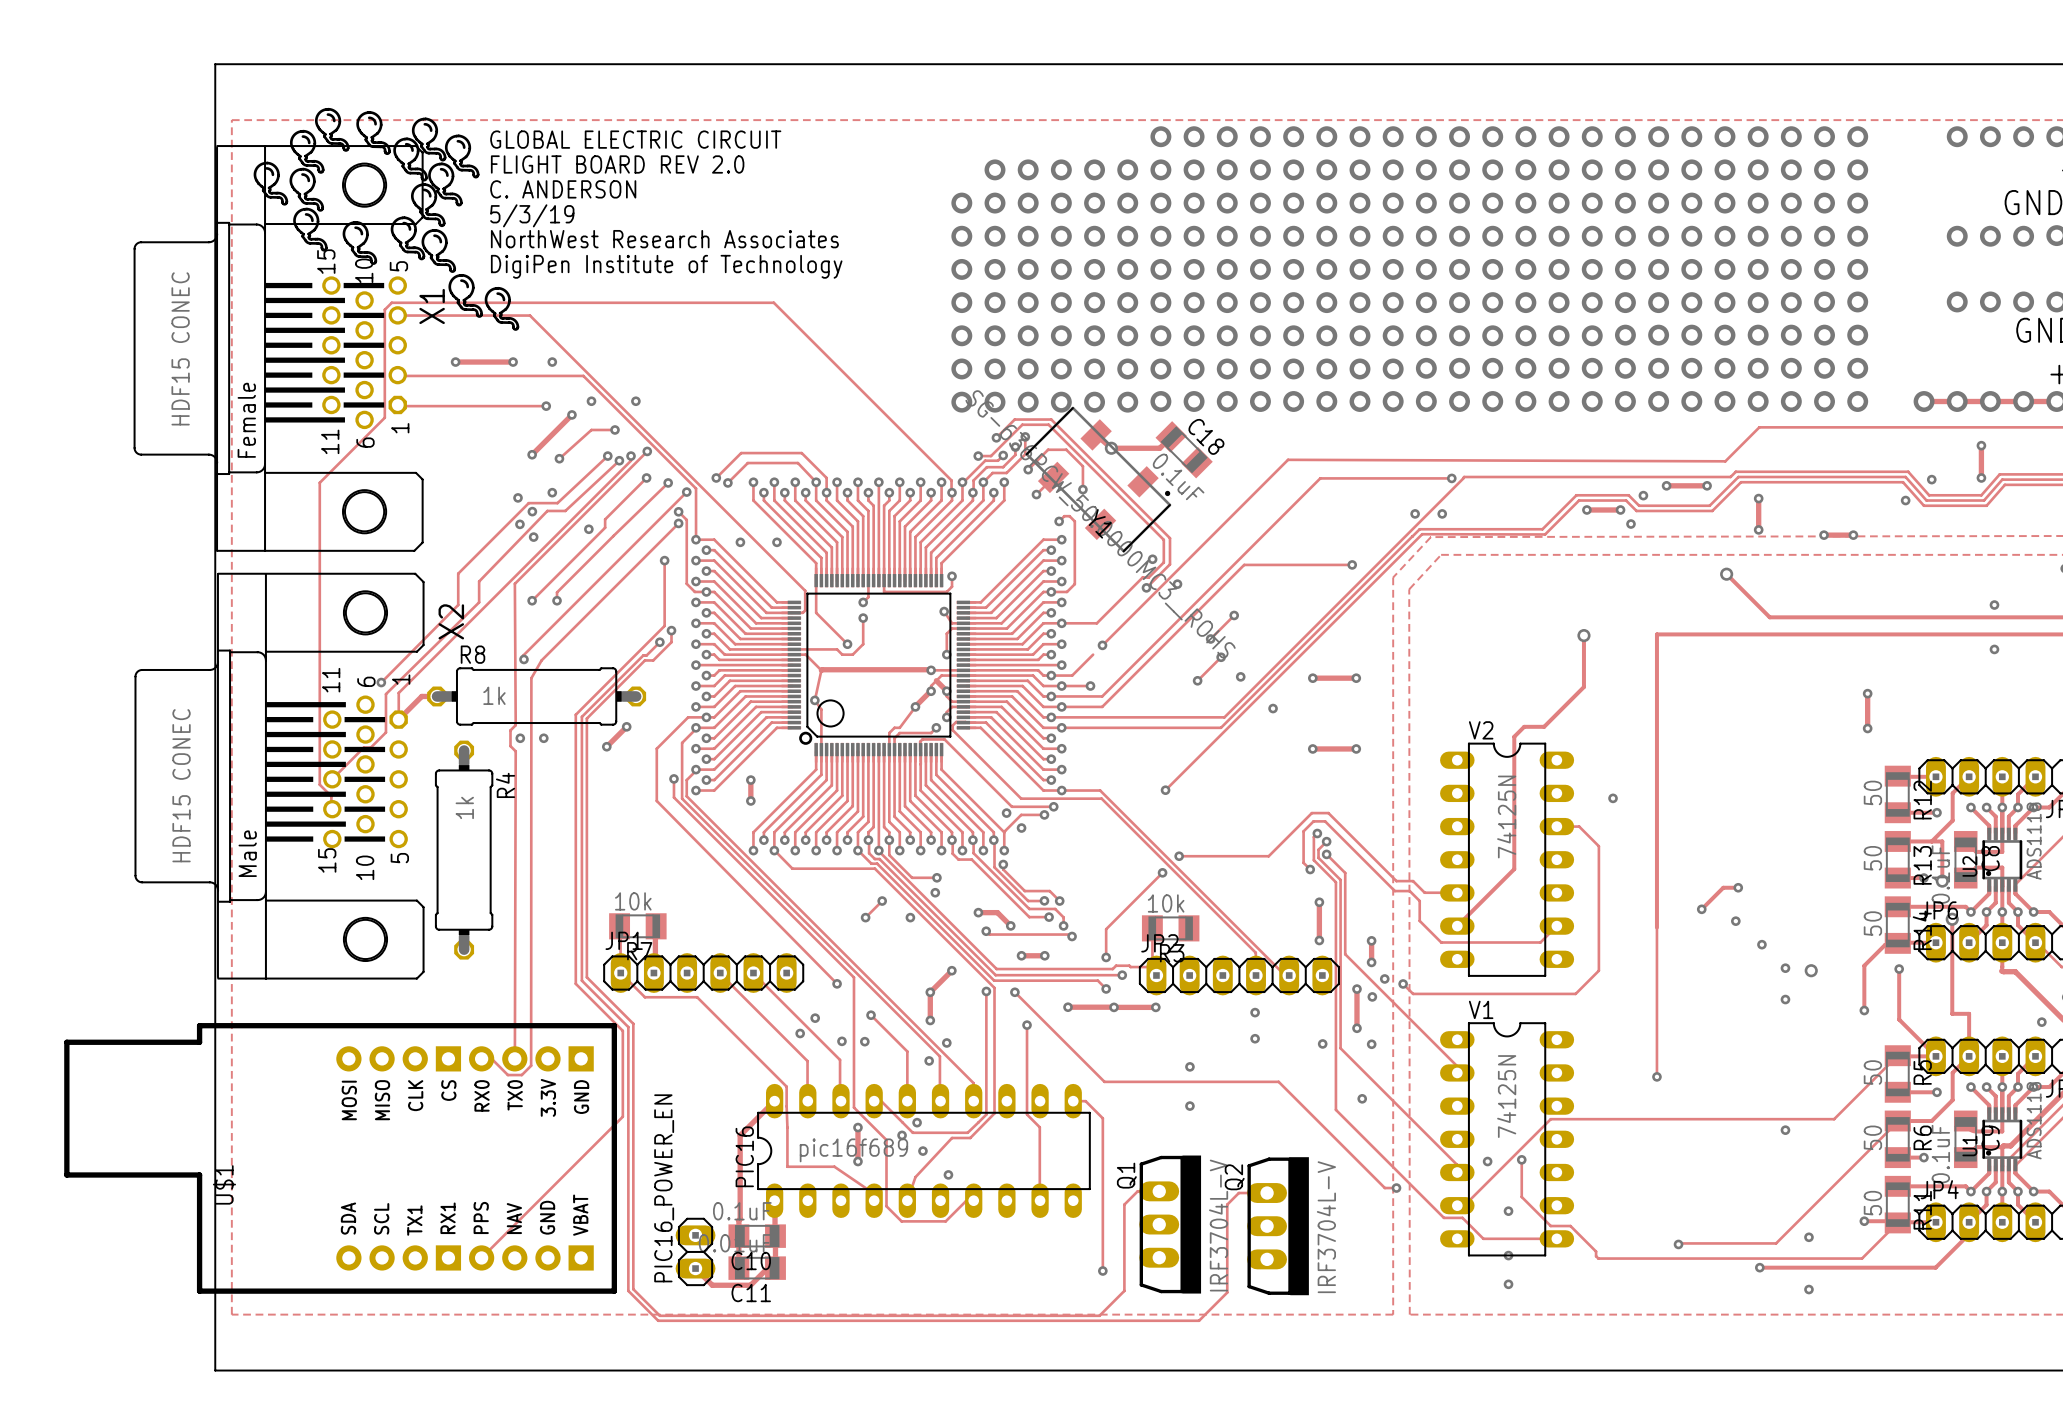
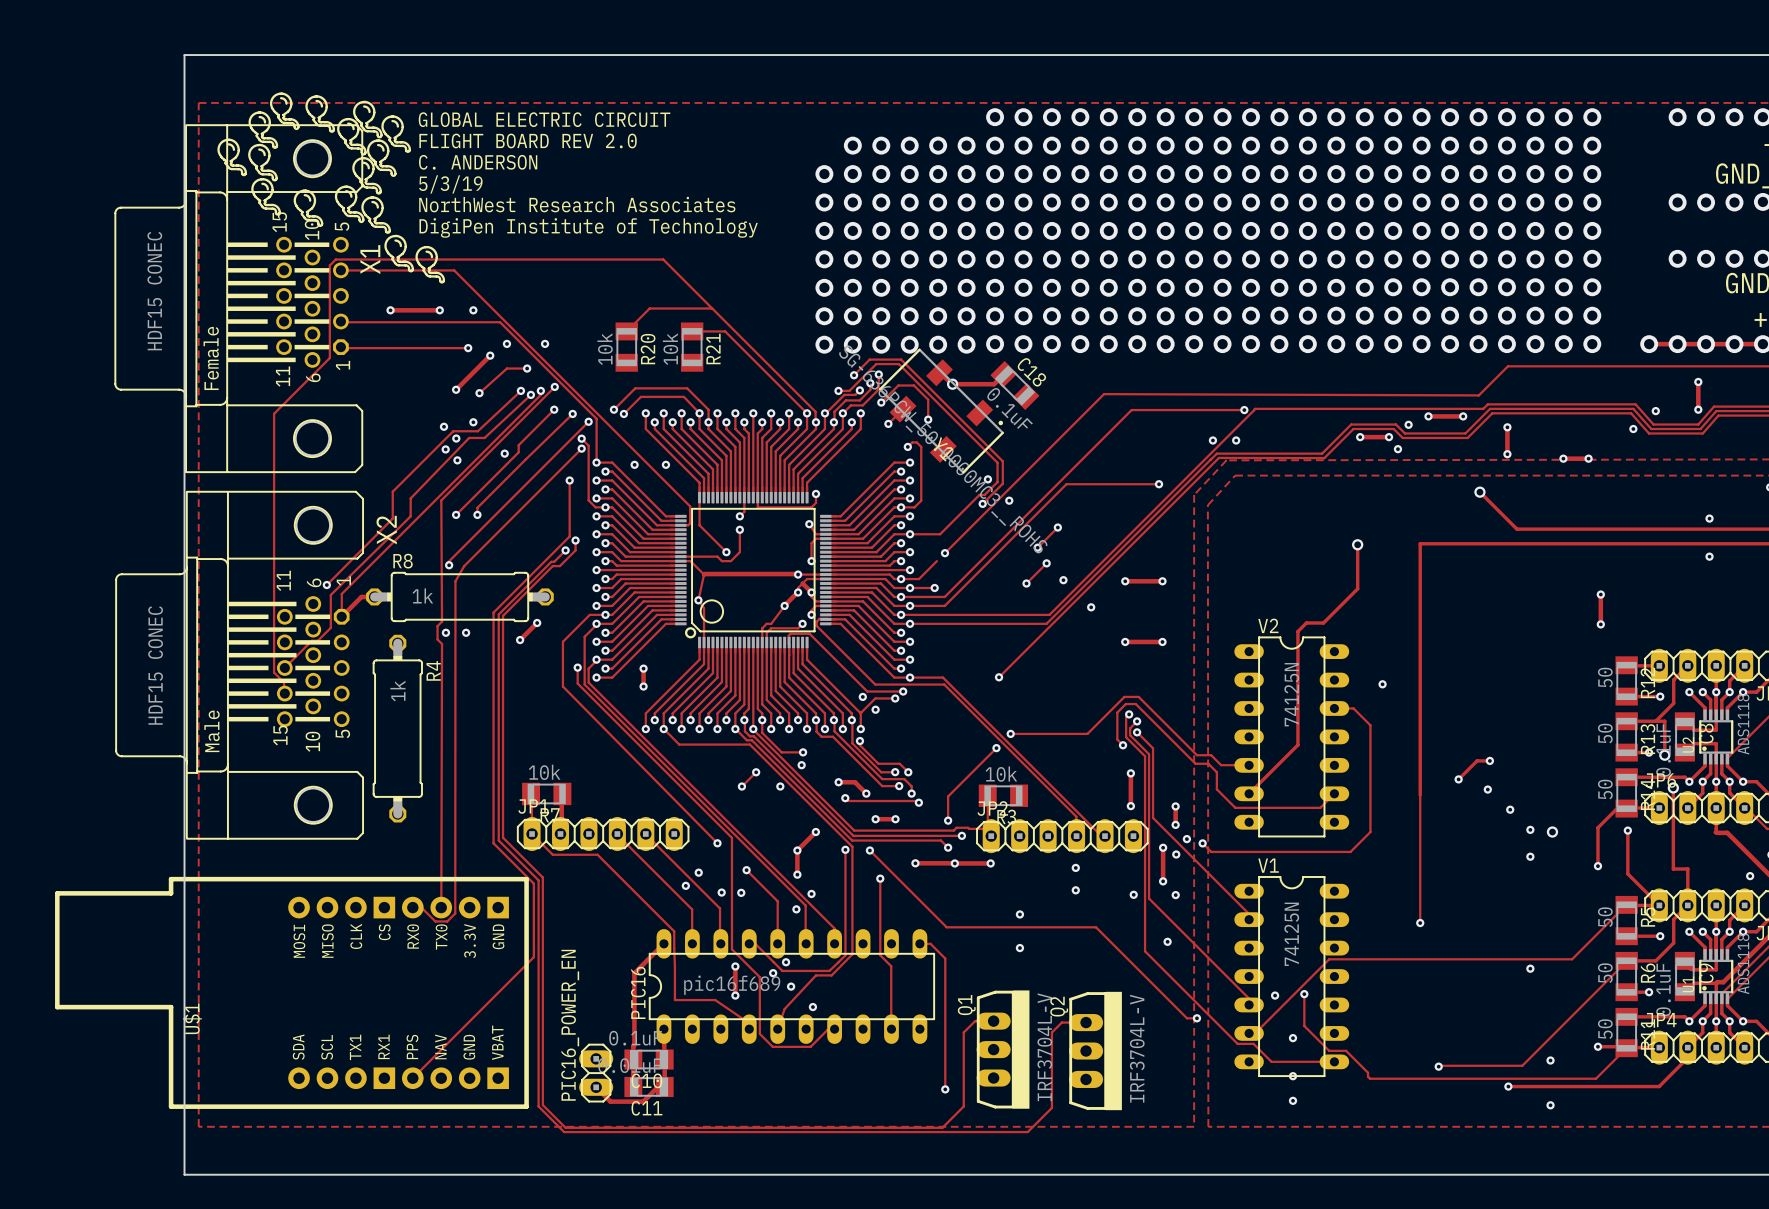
track: none -> (712, 308) (649, 308) (626, 331)
track: none -> (692, 331) (725, 331) (807, 413)
R20: none -> 10k (626, 347)
R21: none -> 10k (692, 347)

